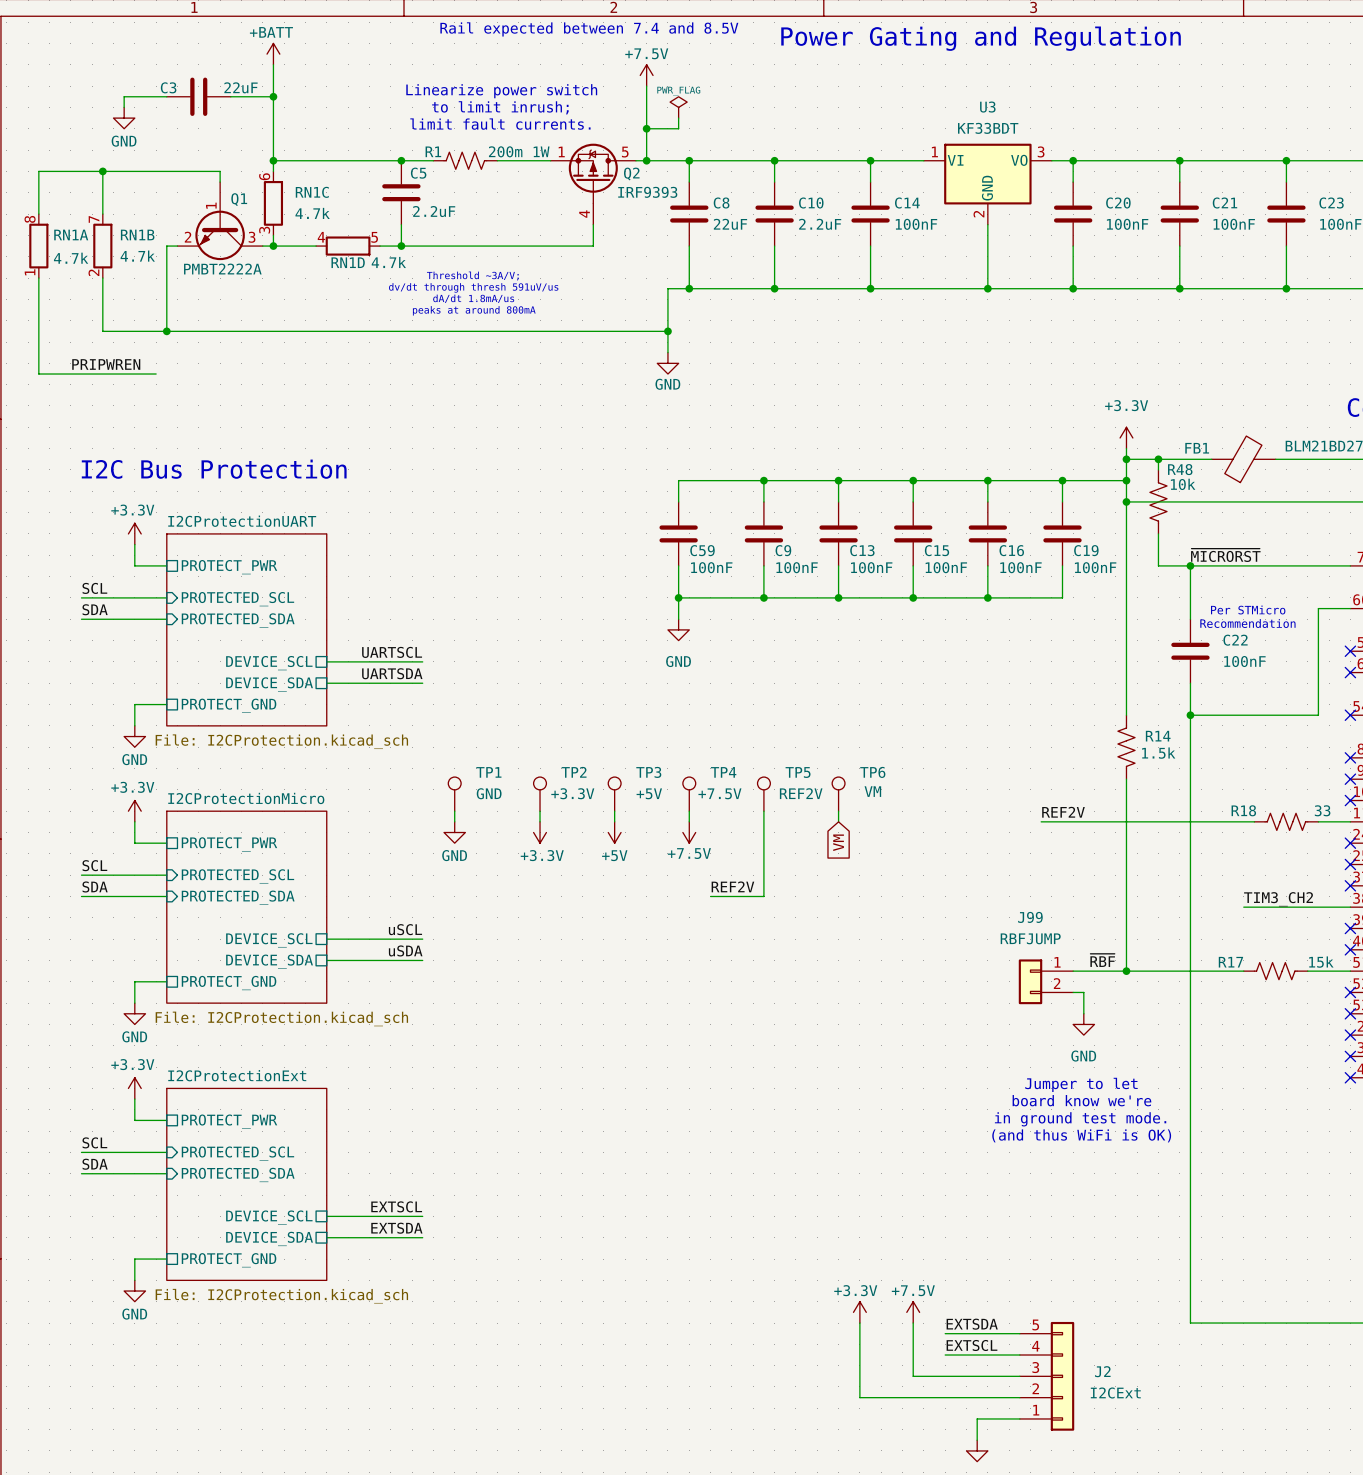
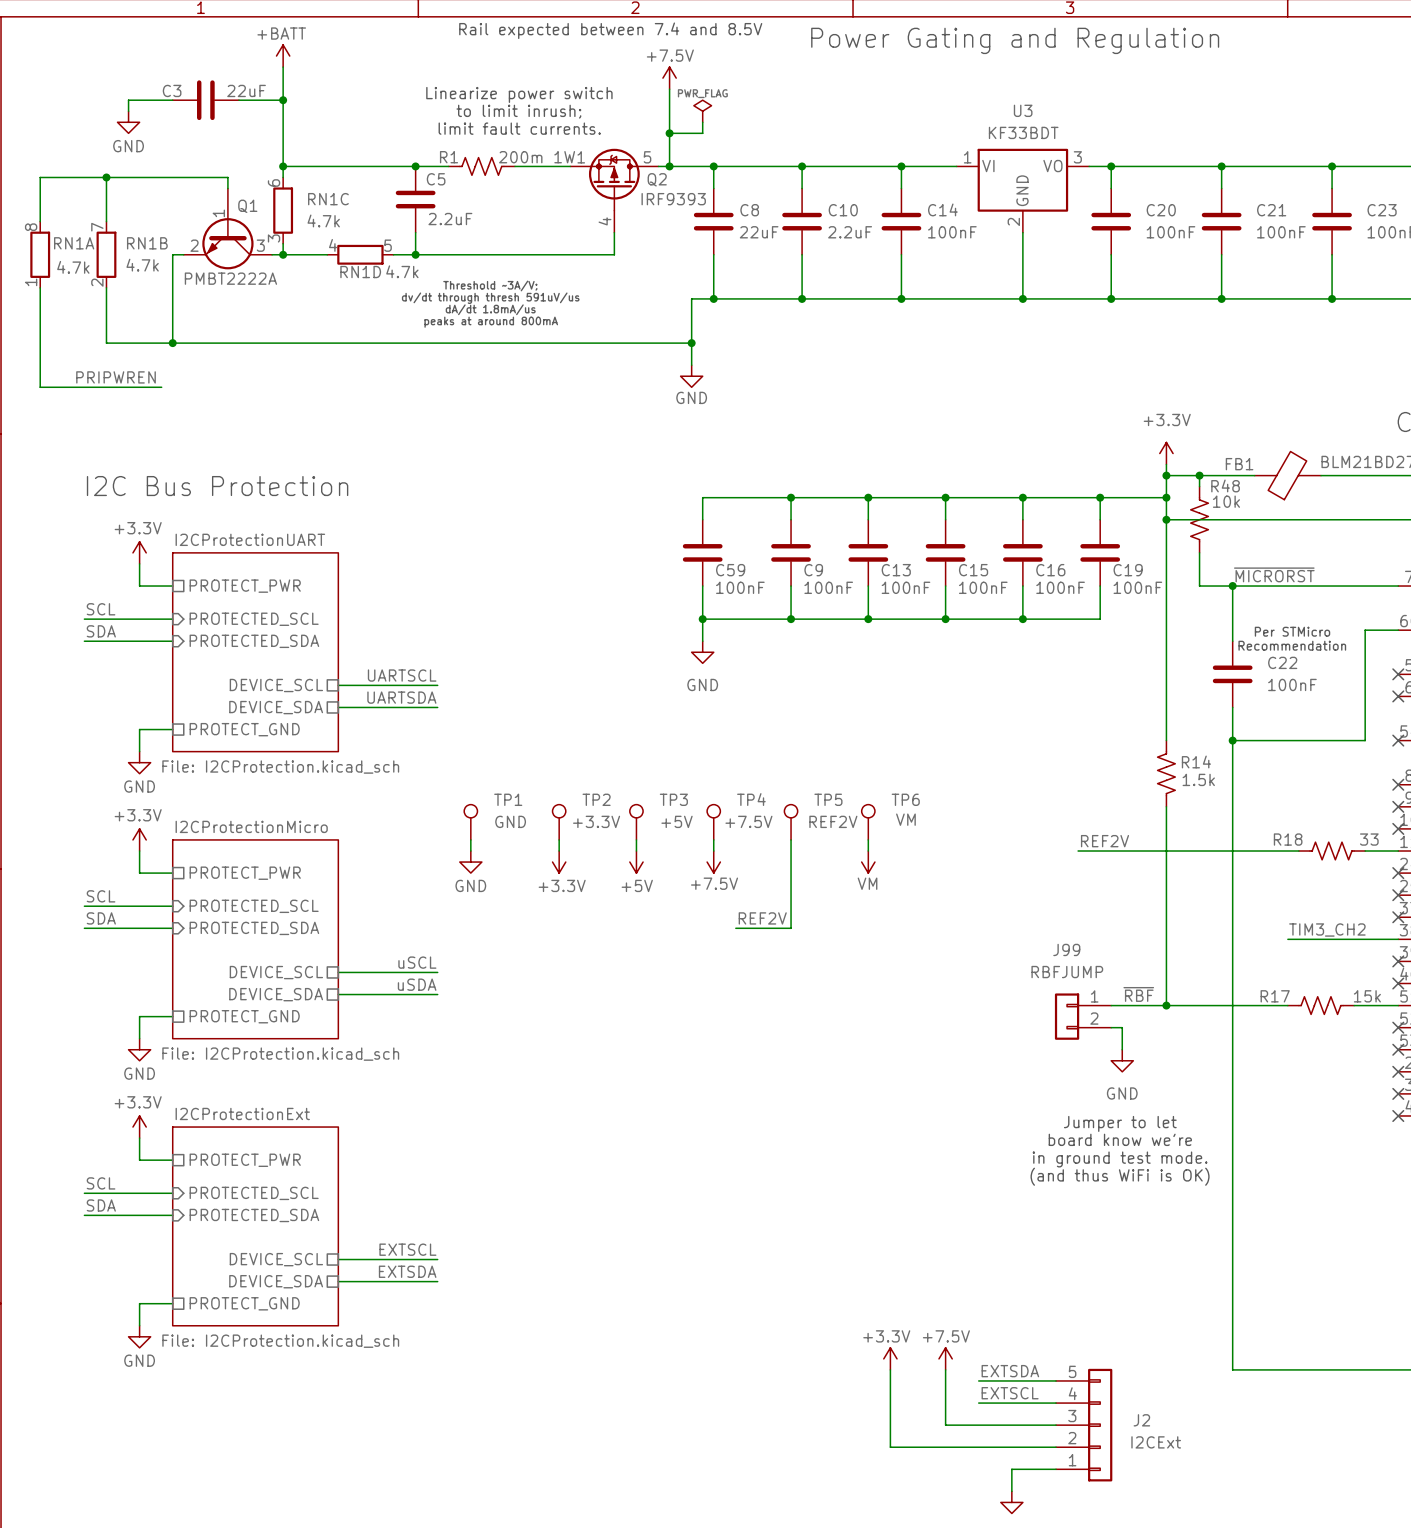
power symbol: none -> VM (868, 862)
global label: VM (838, 842) -> none

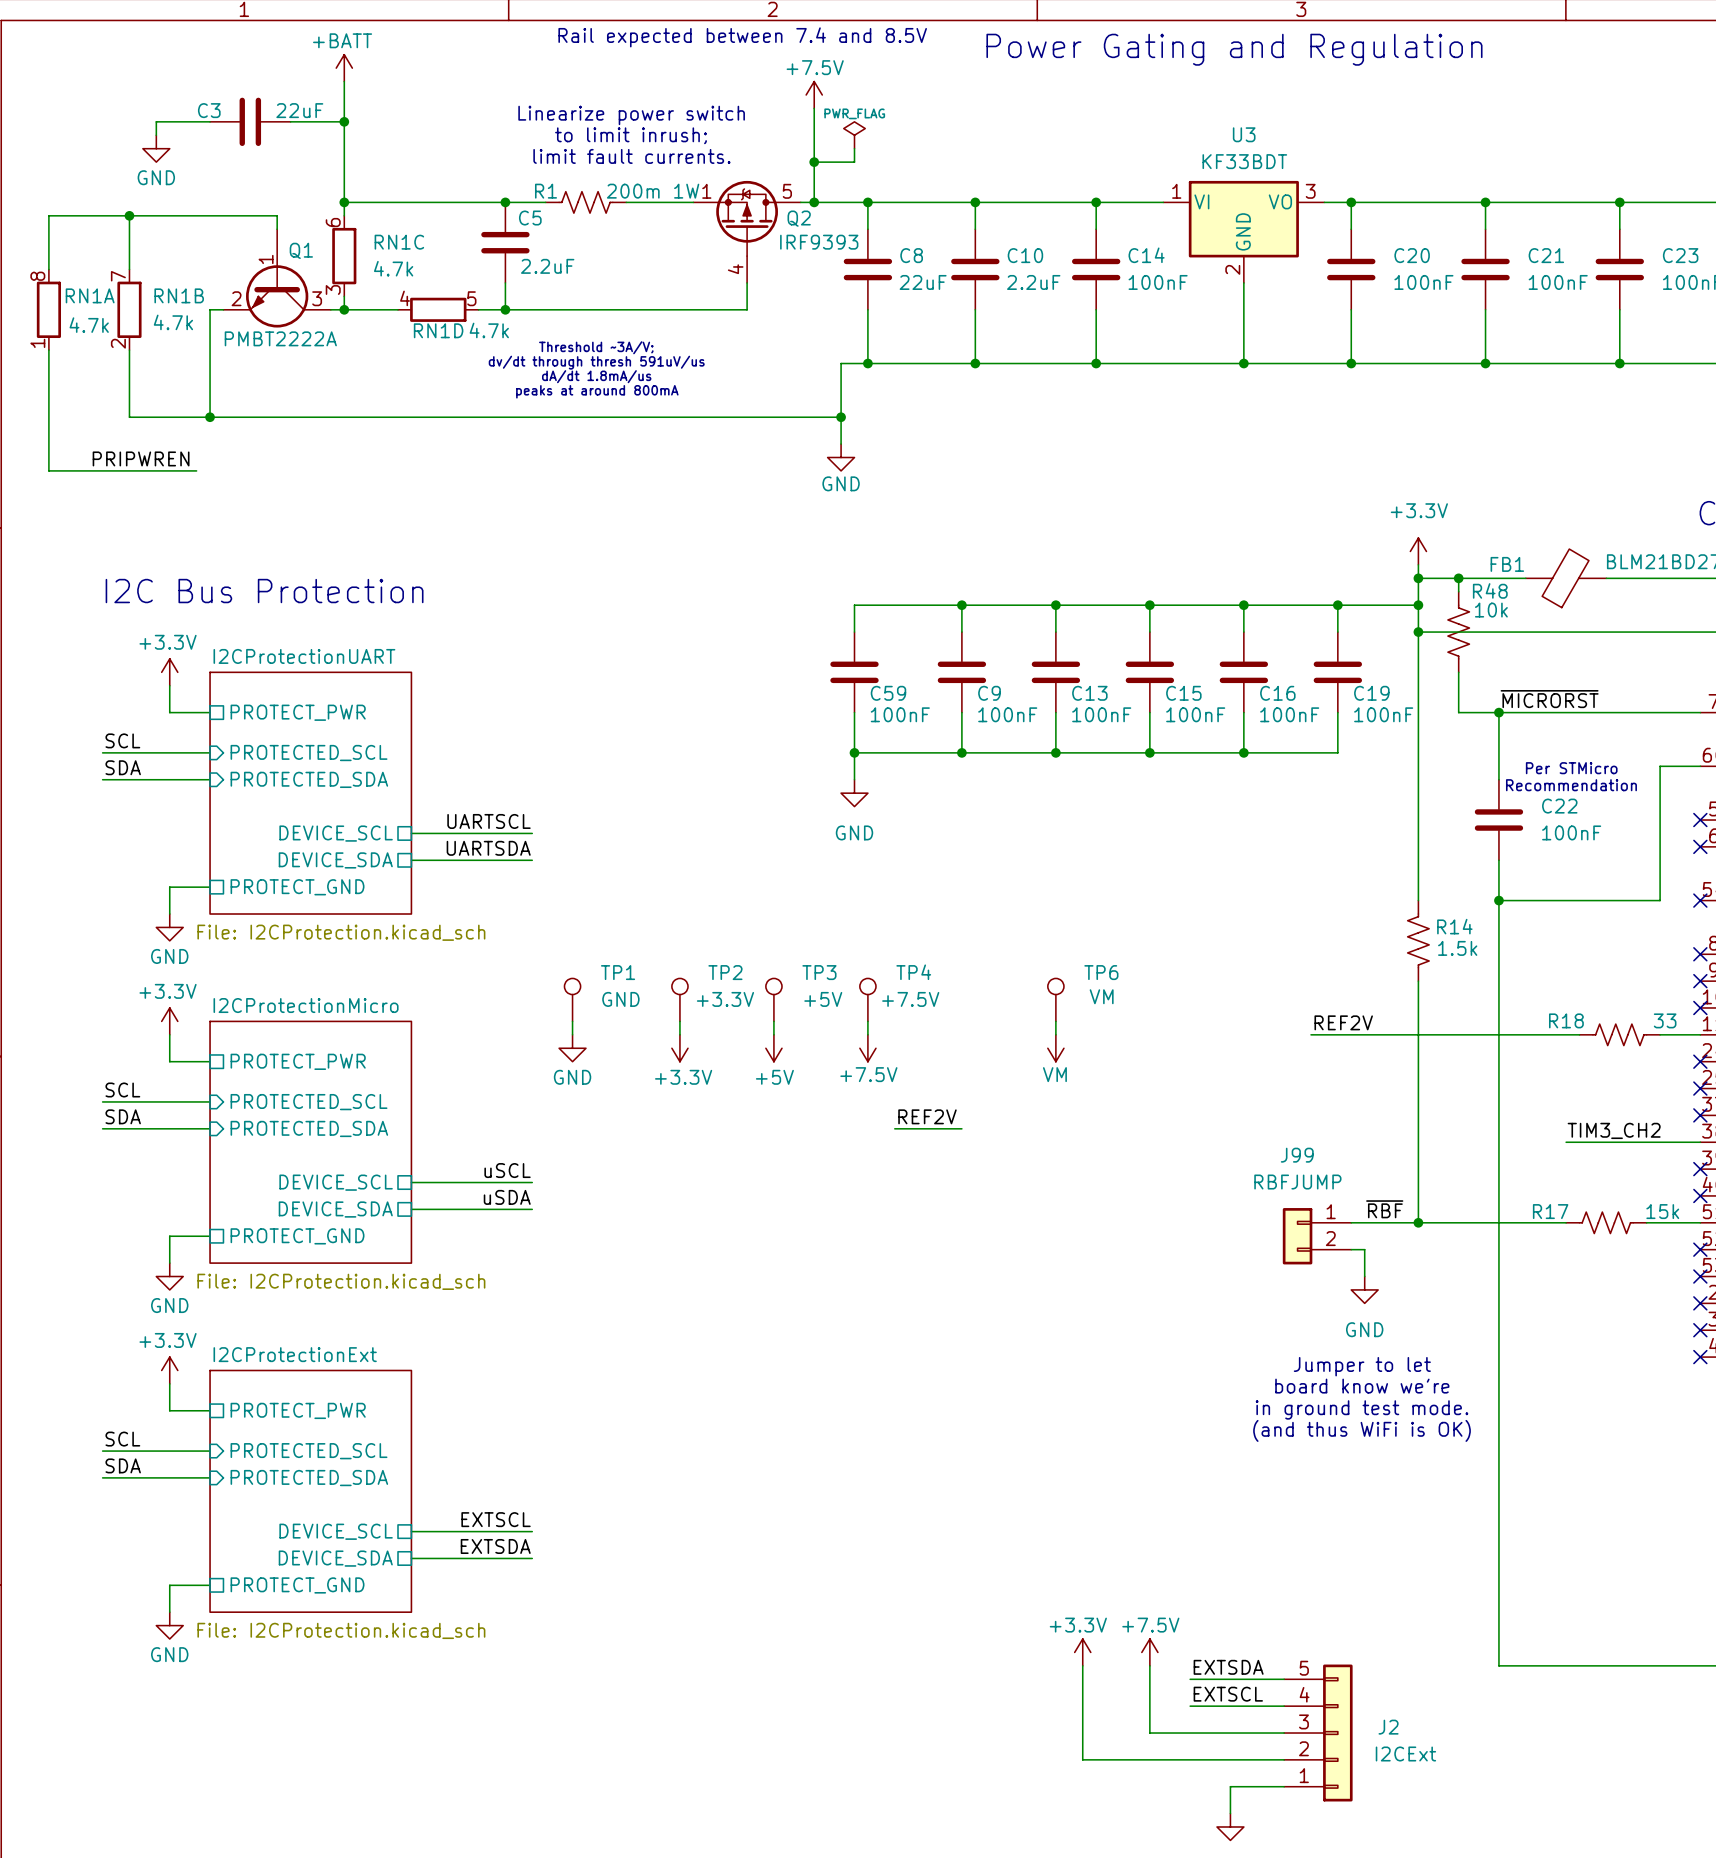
TP5: REF2V (791, 822) -> none
wire: (791, 839) (791, 928) -> none

